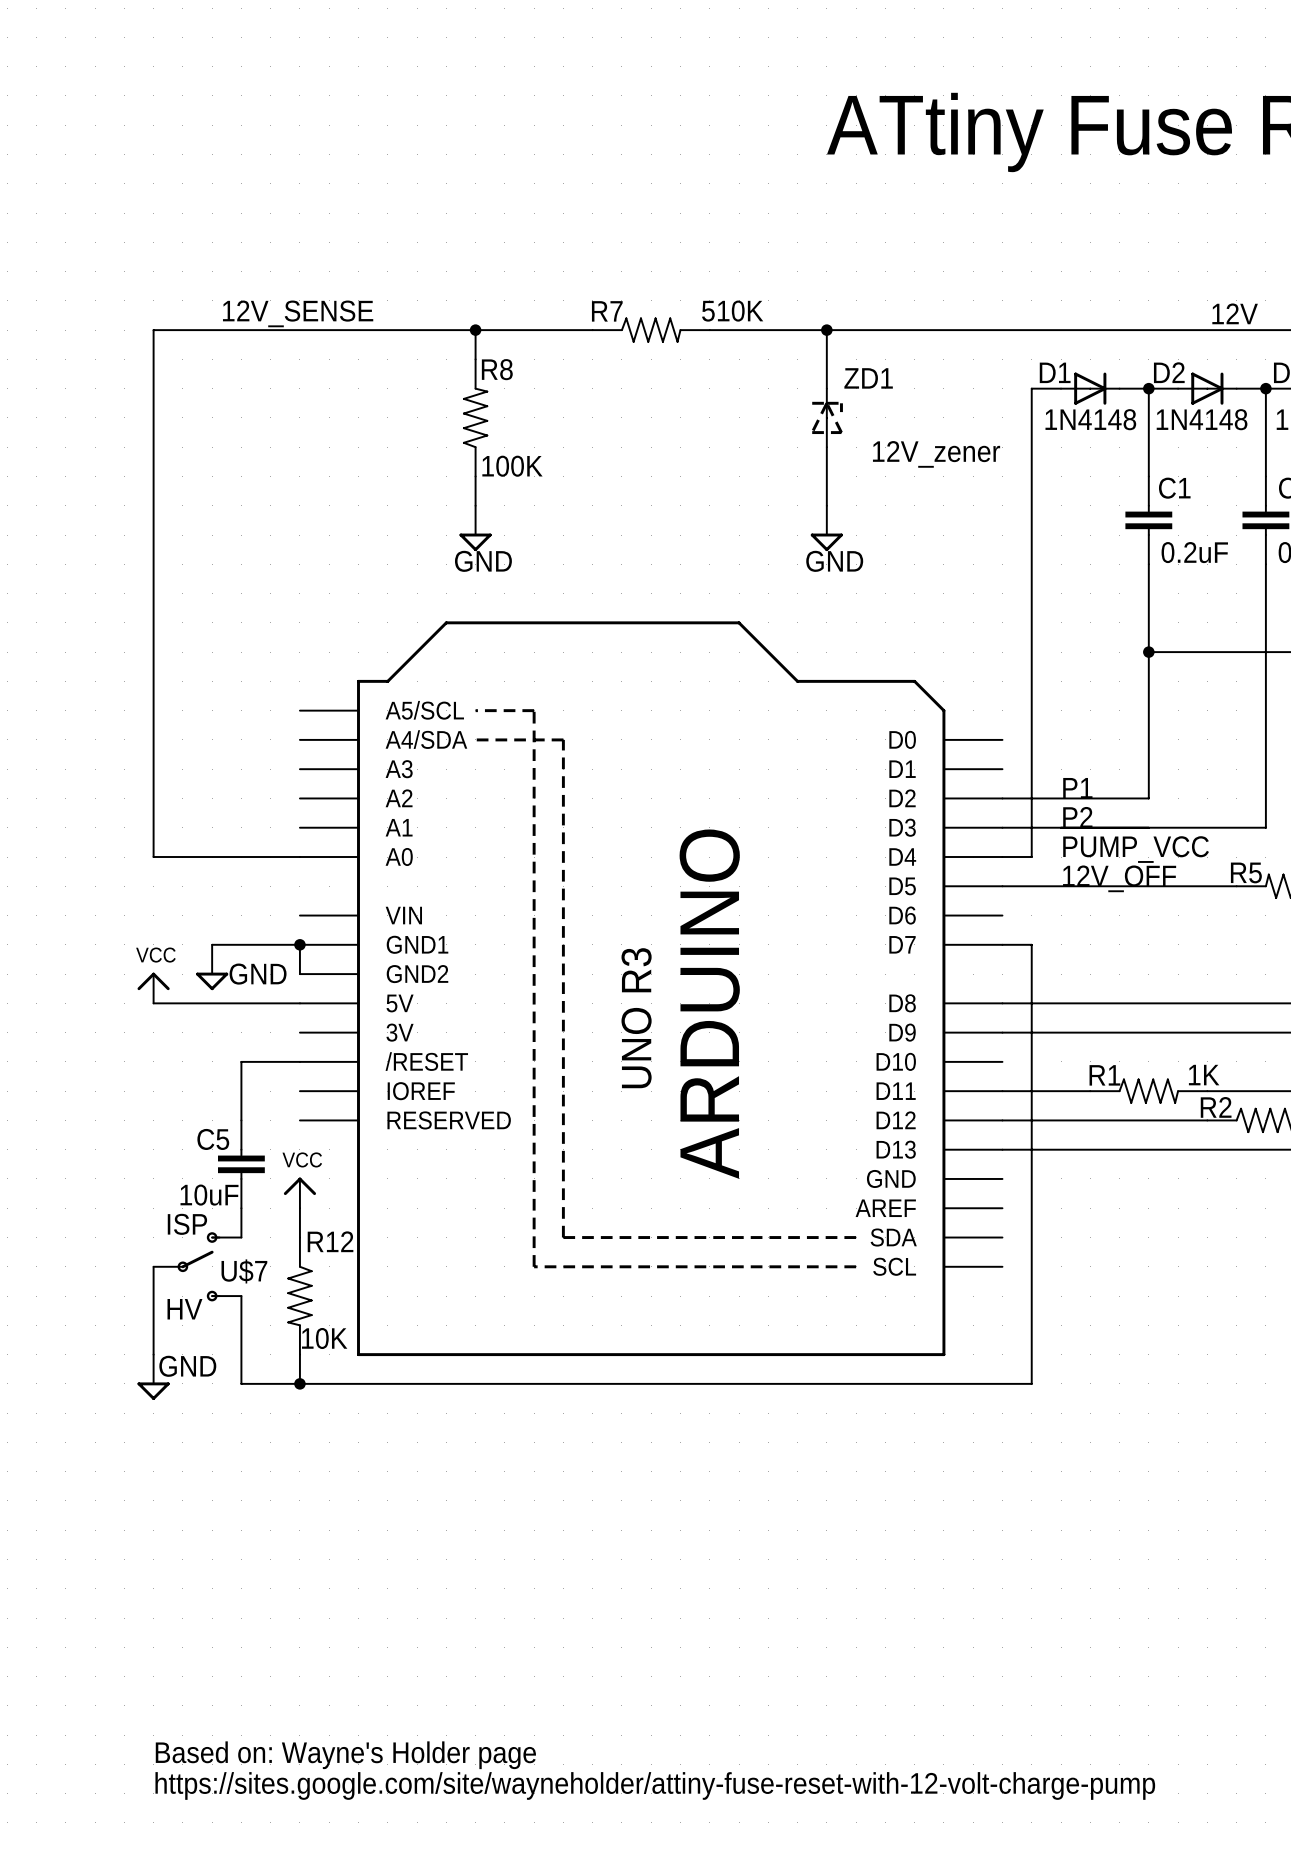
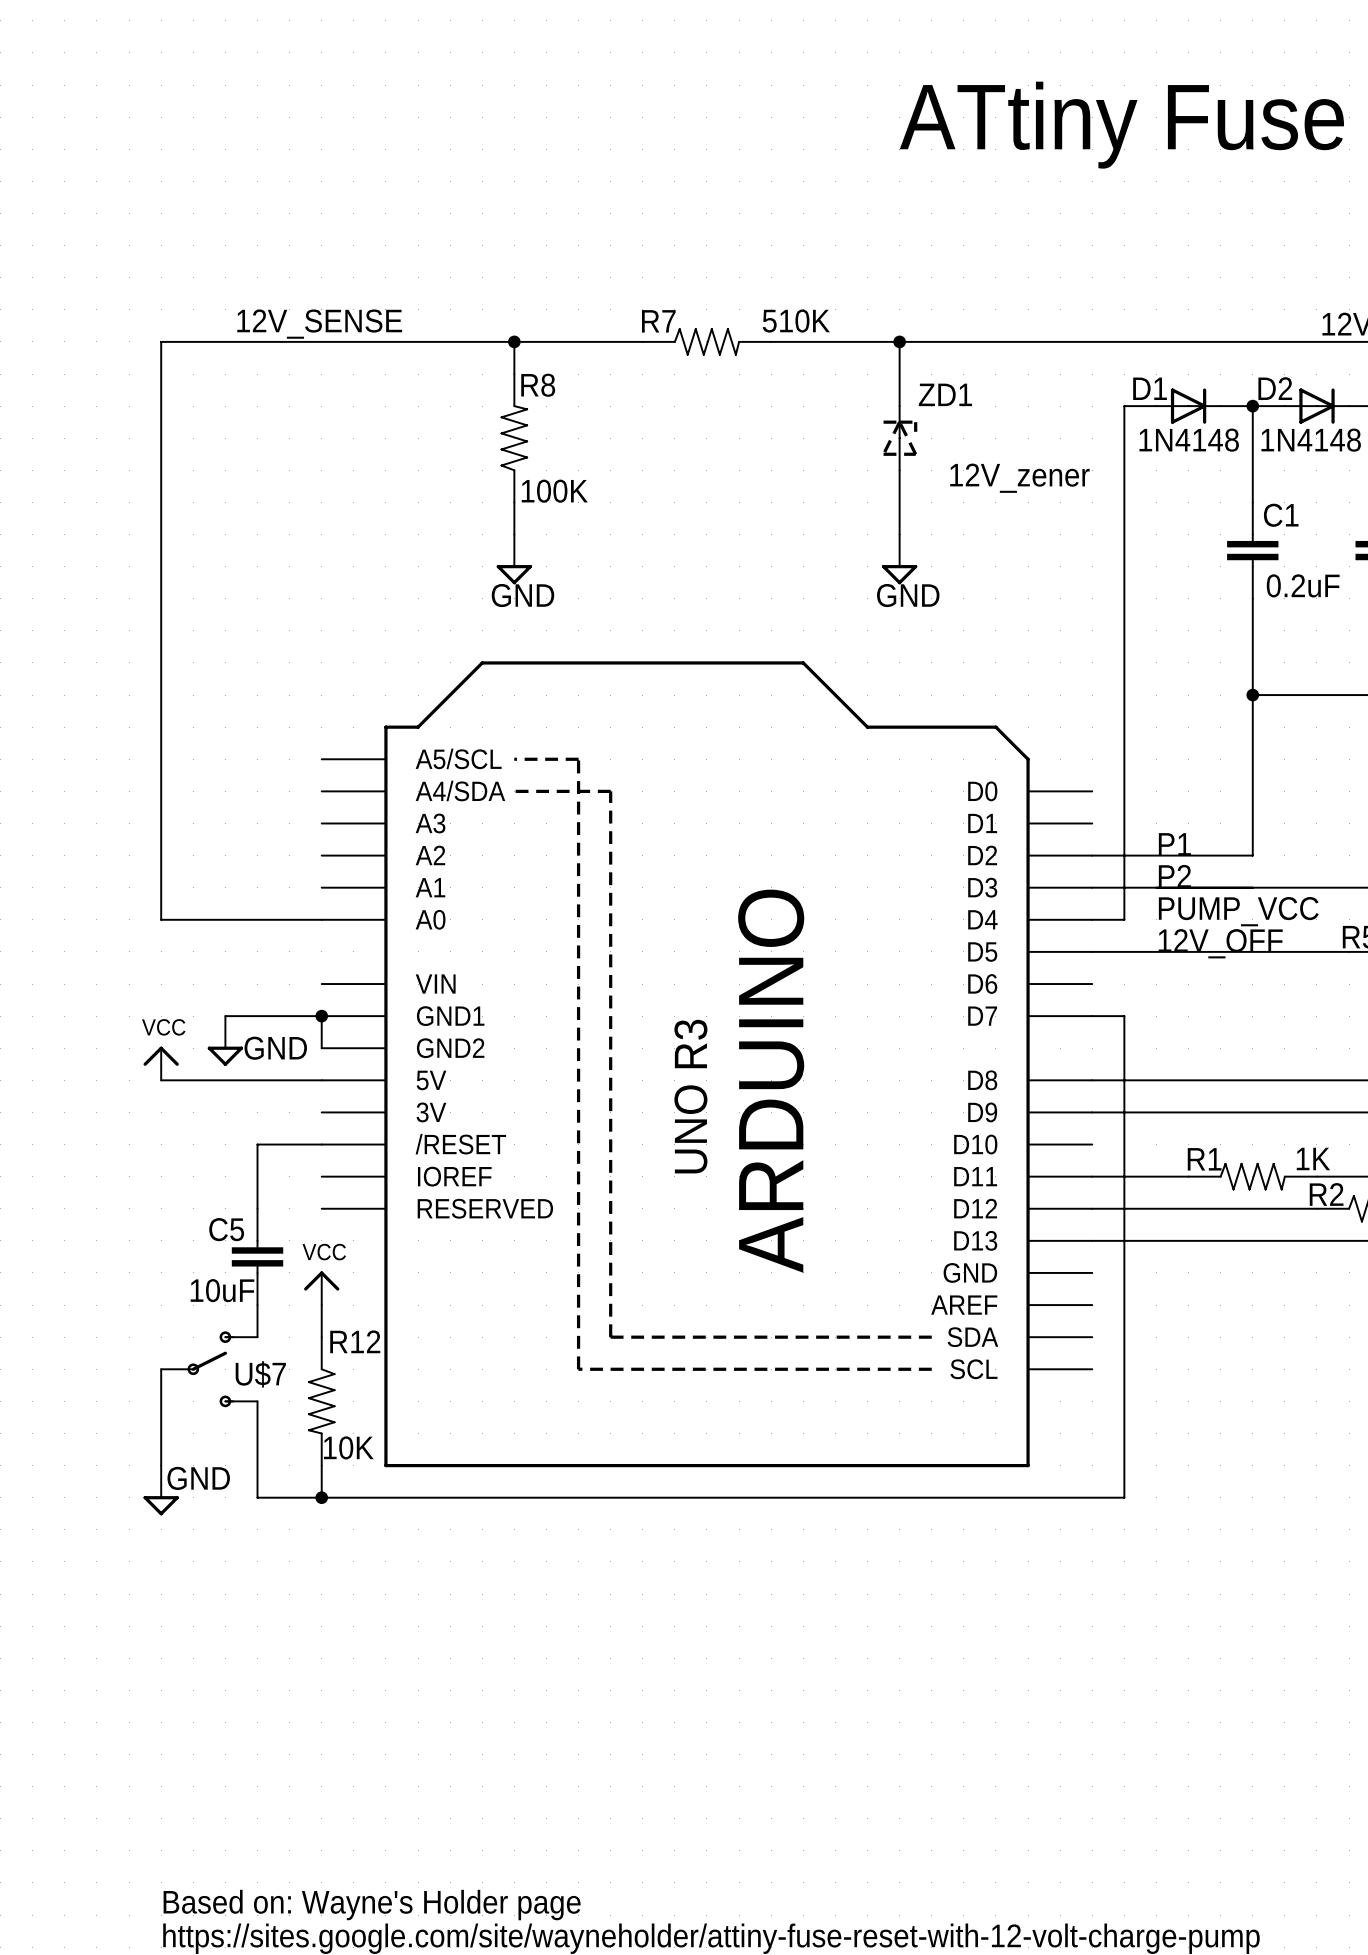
text: ISP (187, 1224) -> none
text: HV (184, 1309) -> none

